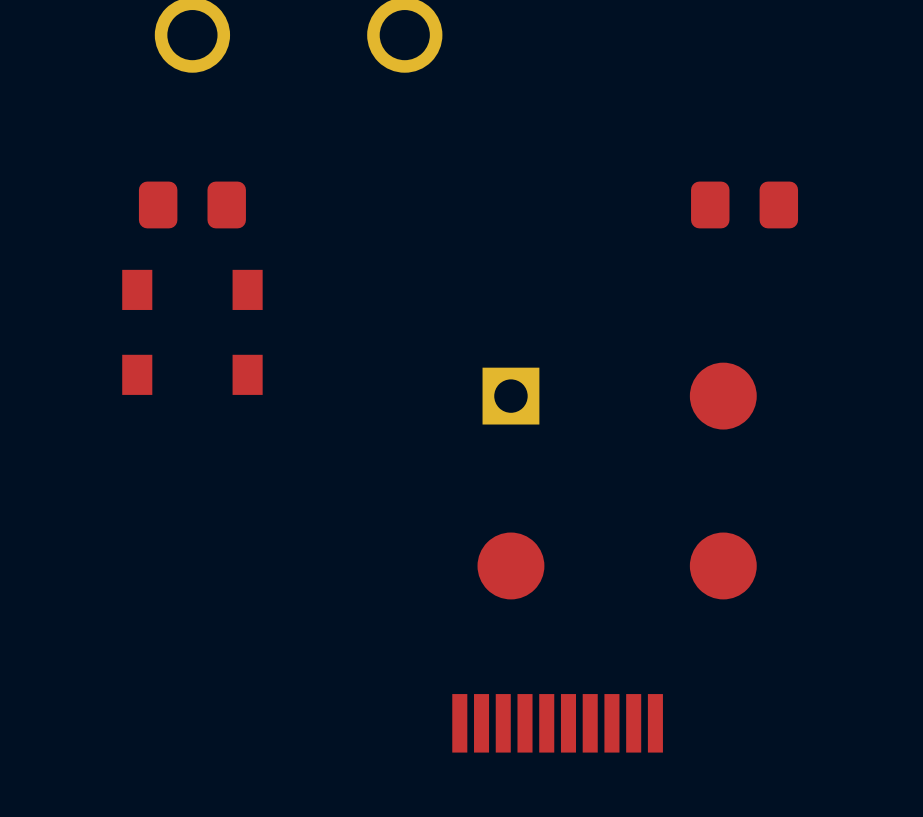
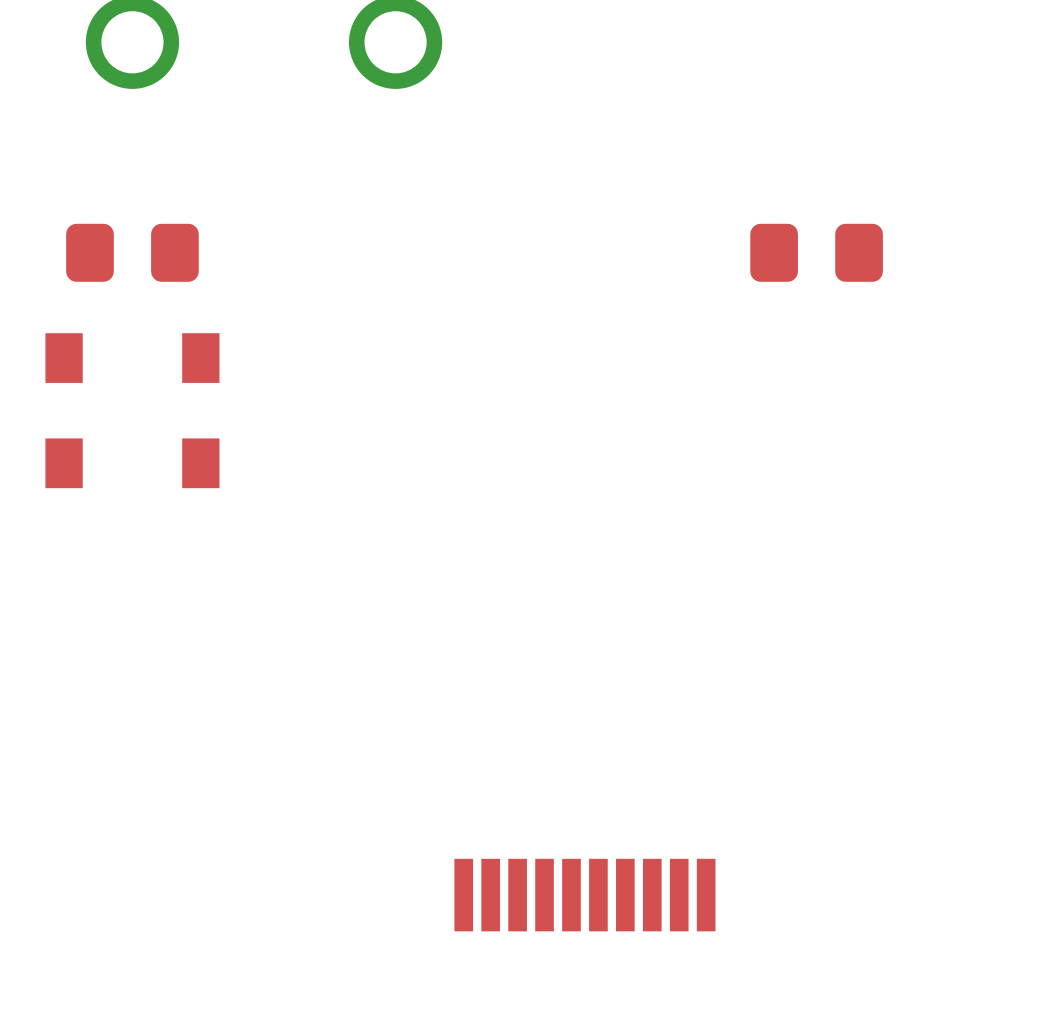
part: (510, 396) -> none
part: (723, 396) -> none
part: (510, 565) -> none
part: (723, 565) -> none

